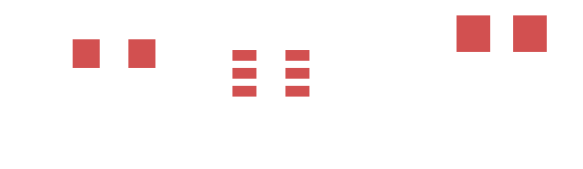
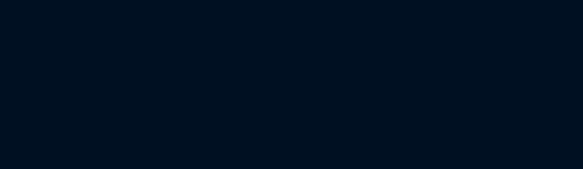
part: (501, 33) -> none
part: (114, 53) -> none
part: (270, 73) -> none

